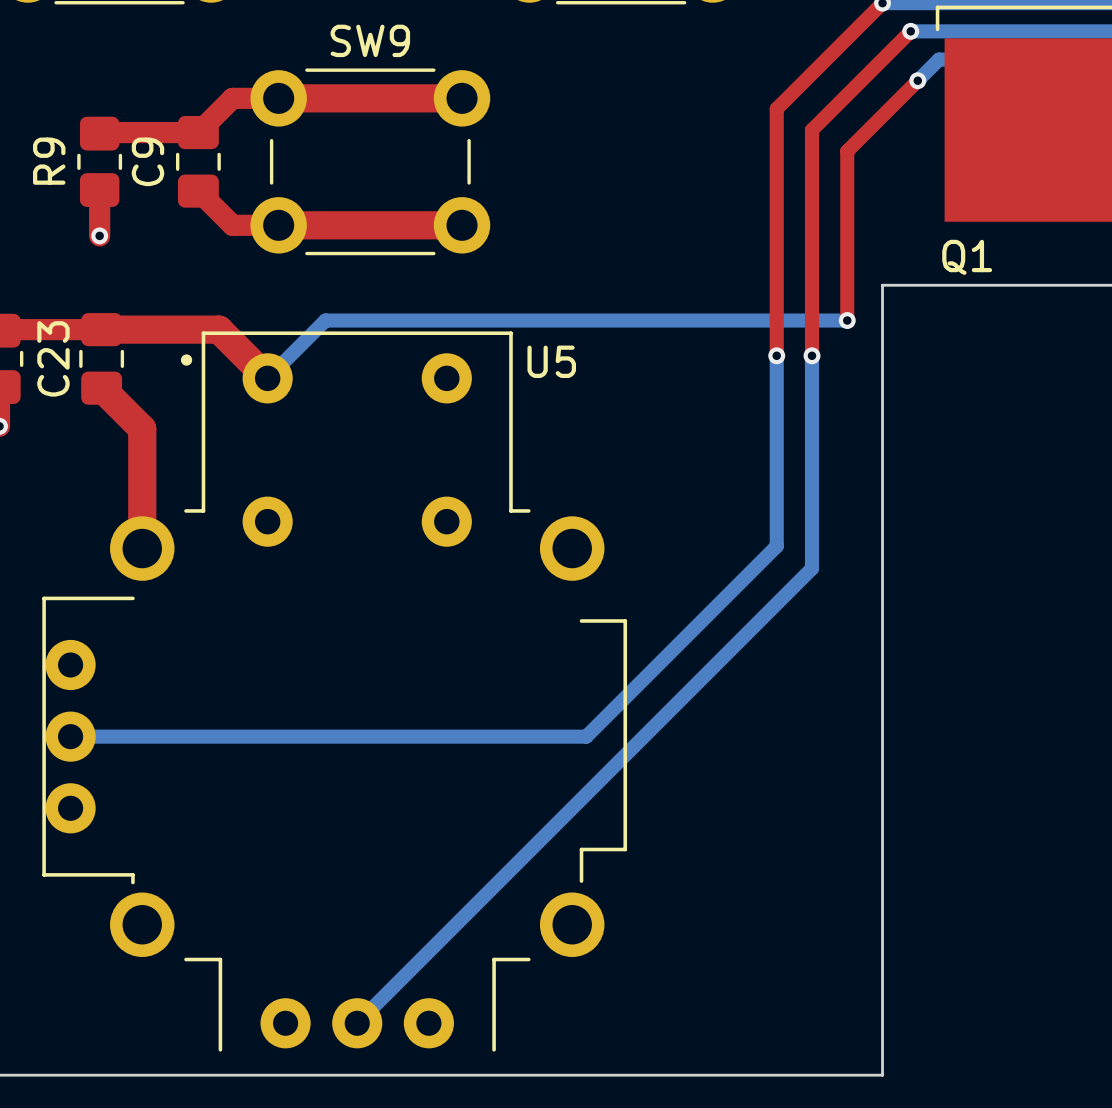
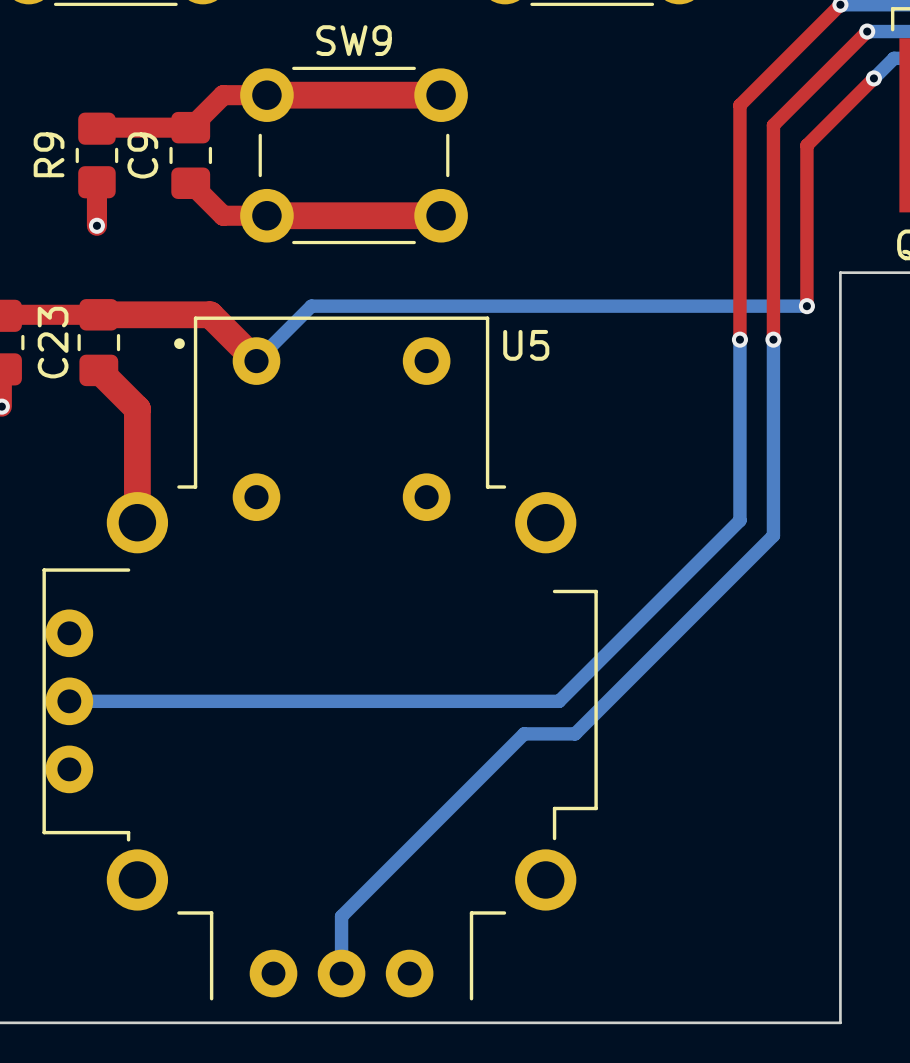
bottom track: (812, 562) (812, 568) (357, 1023) -> (773, 535) (575, 733) (524, 733) (341, 916) (341, 973)

